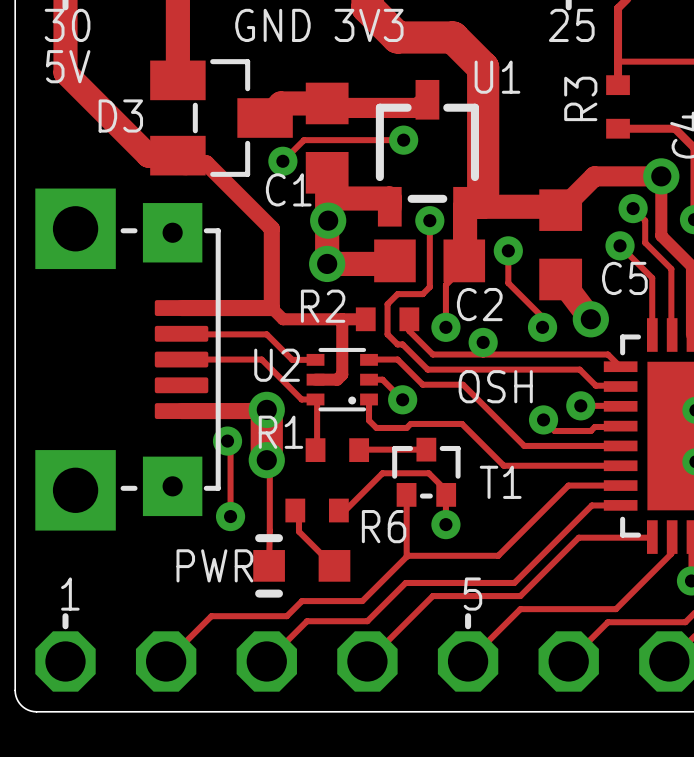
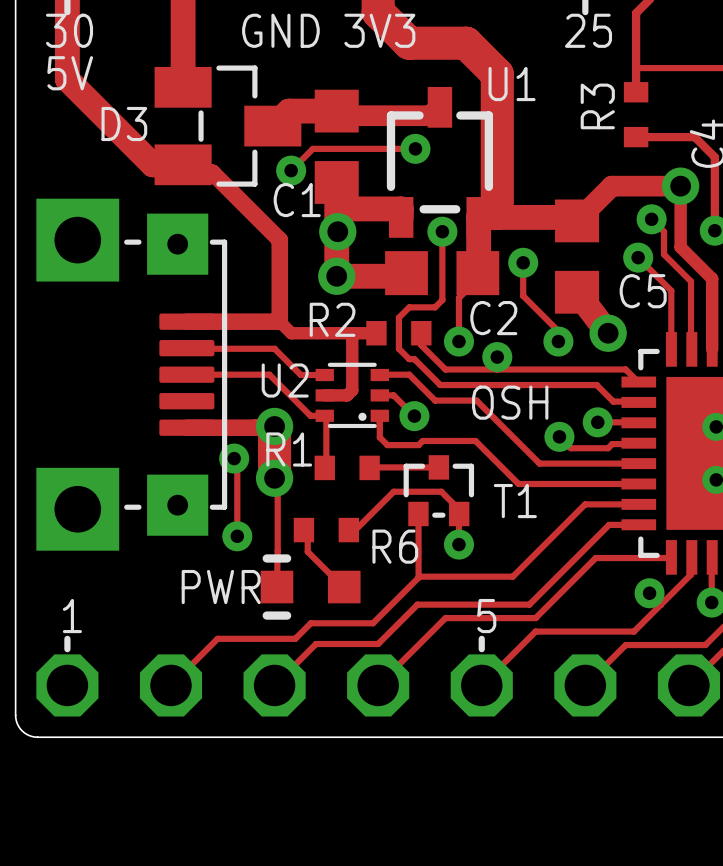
via: none -> (649, 593)

